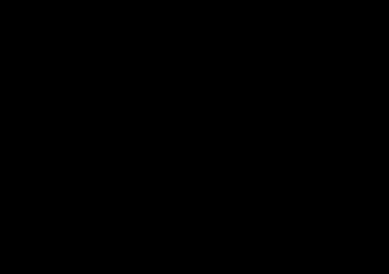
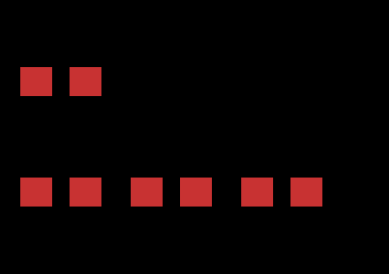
part: none -> (60, 81)
part: none -> (60, 192)
part: none -> (171, 192)
part: none -> (281, 192)

